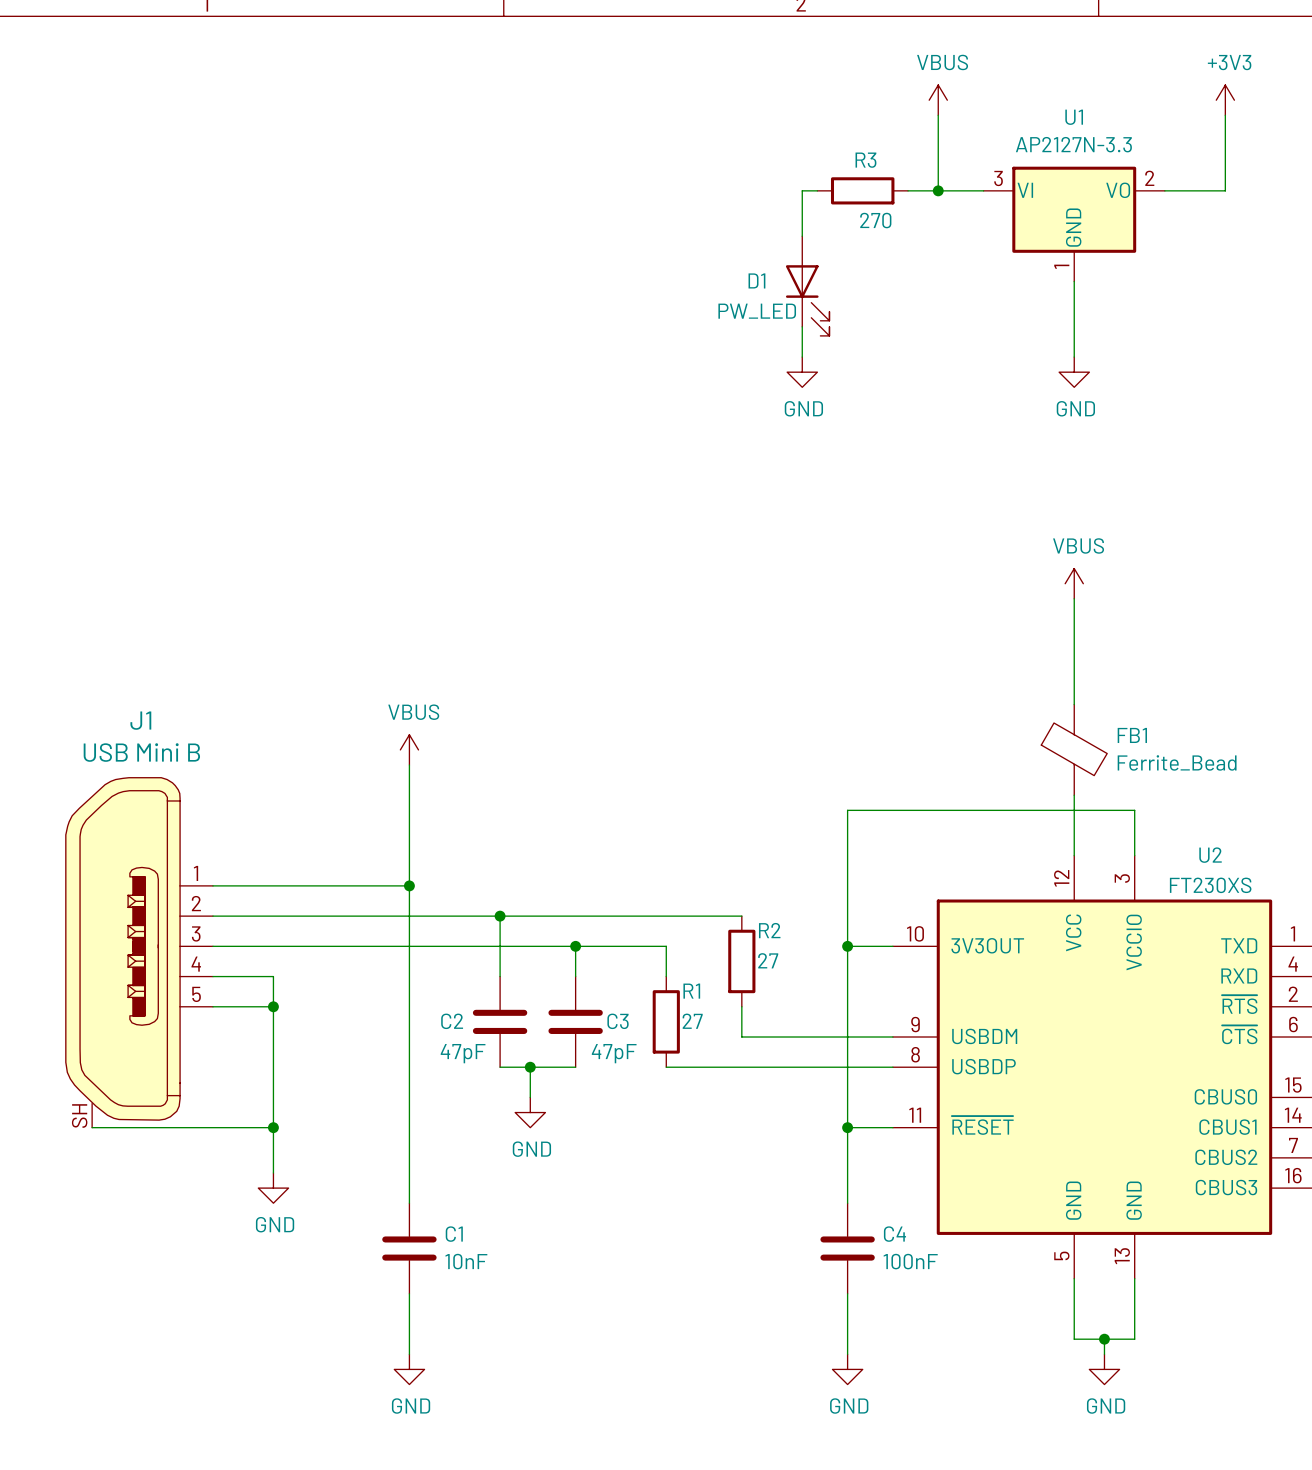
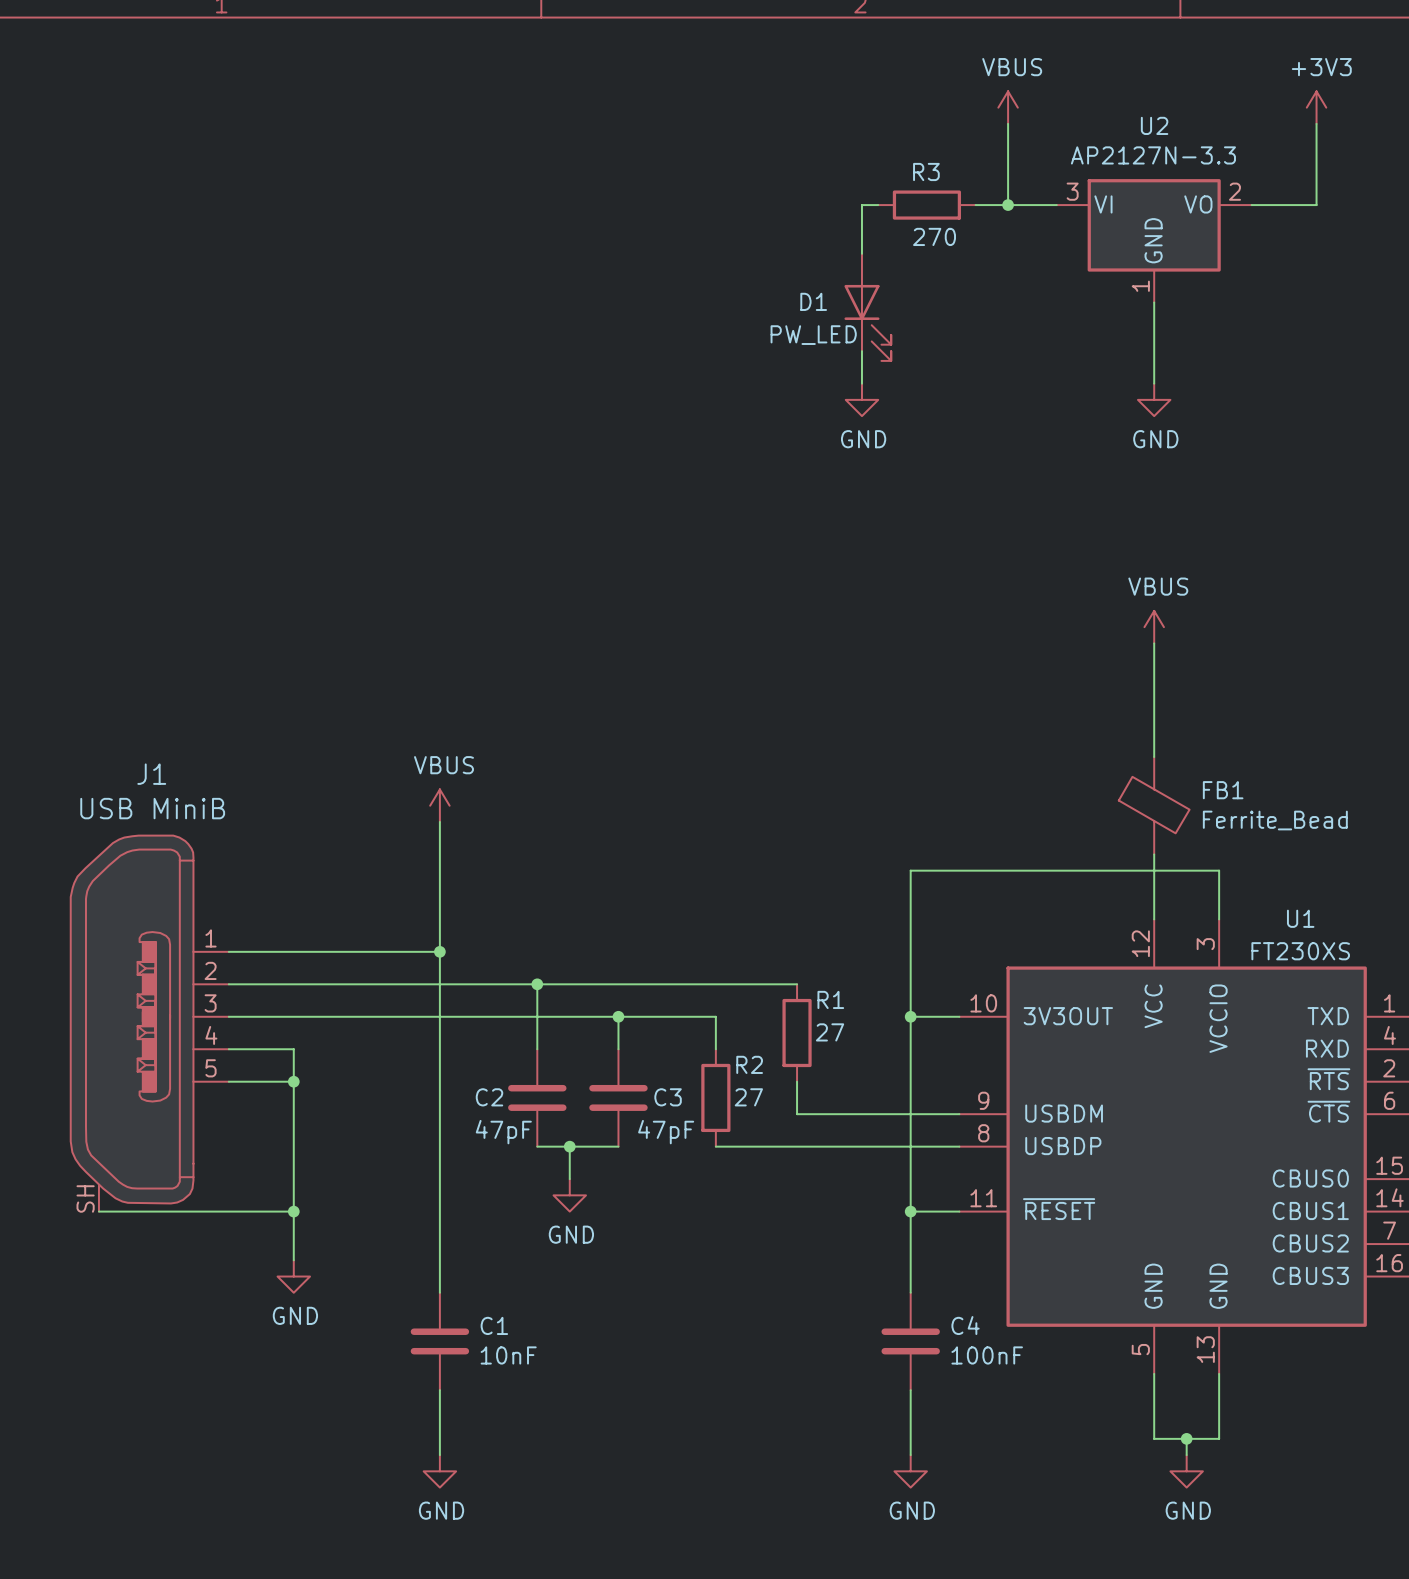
U1 name: U1 (1074, 117) -> U2 (1154, 125)
J1 value: USB Mini B (141, 752) -> USB MiniB (152, 808)
U2 name: U2 (1210, 855) -> U1 (1300, 918)
R2 name: R2 (769, 930) -> R1 (830, 999)
R1 name: R1 (691, 991) -> R2 (749, 1064)

